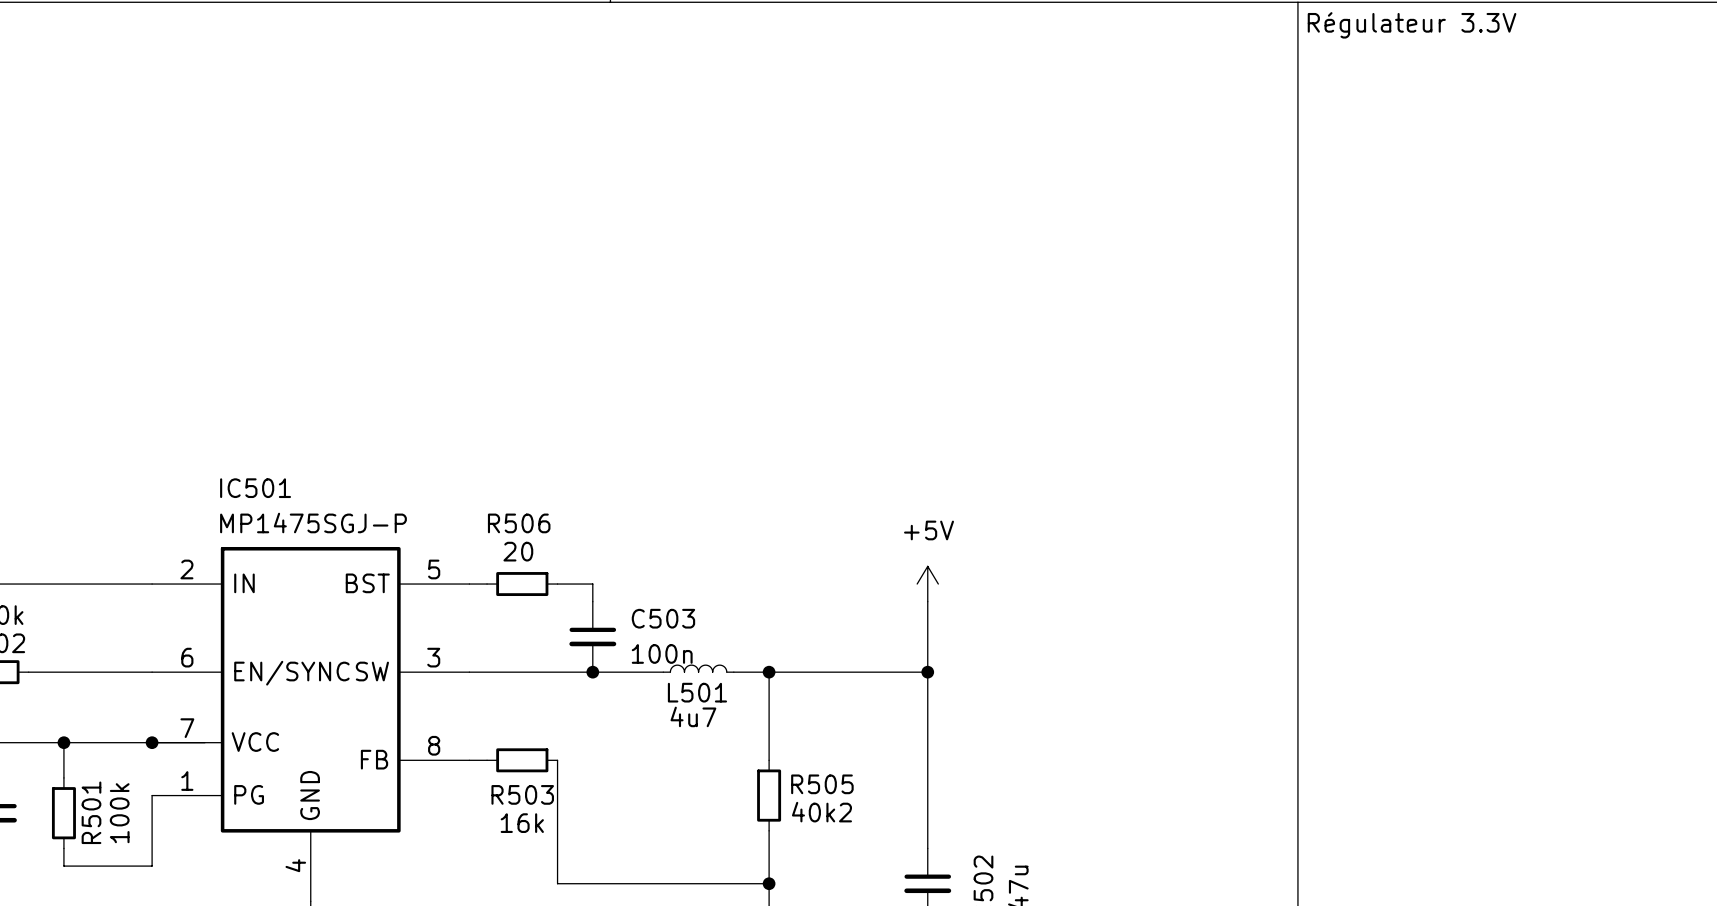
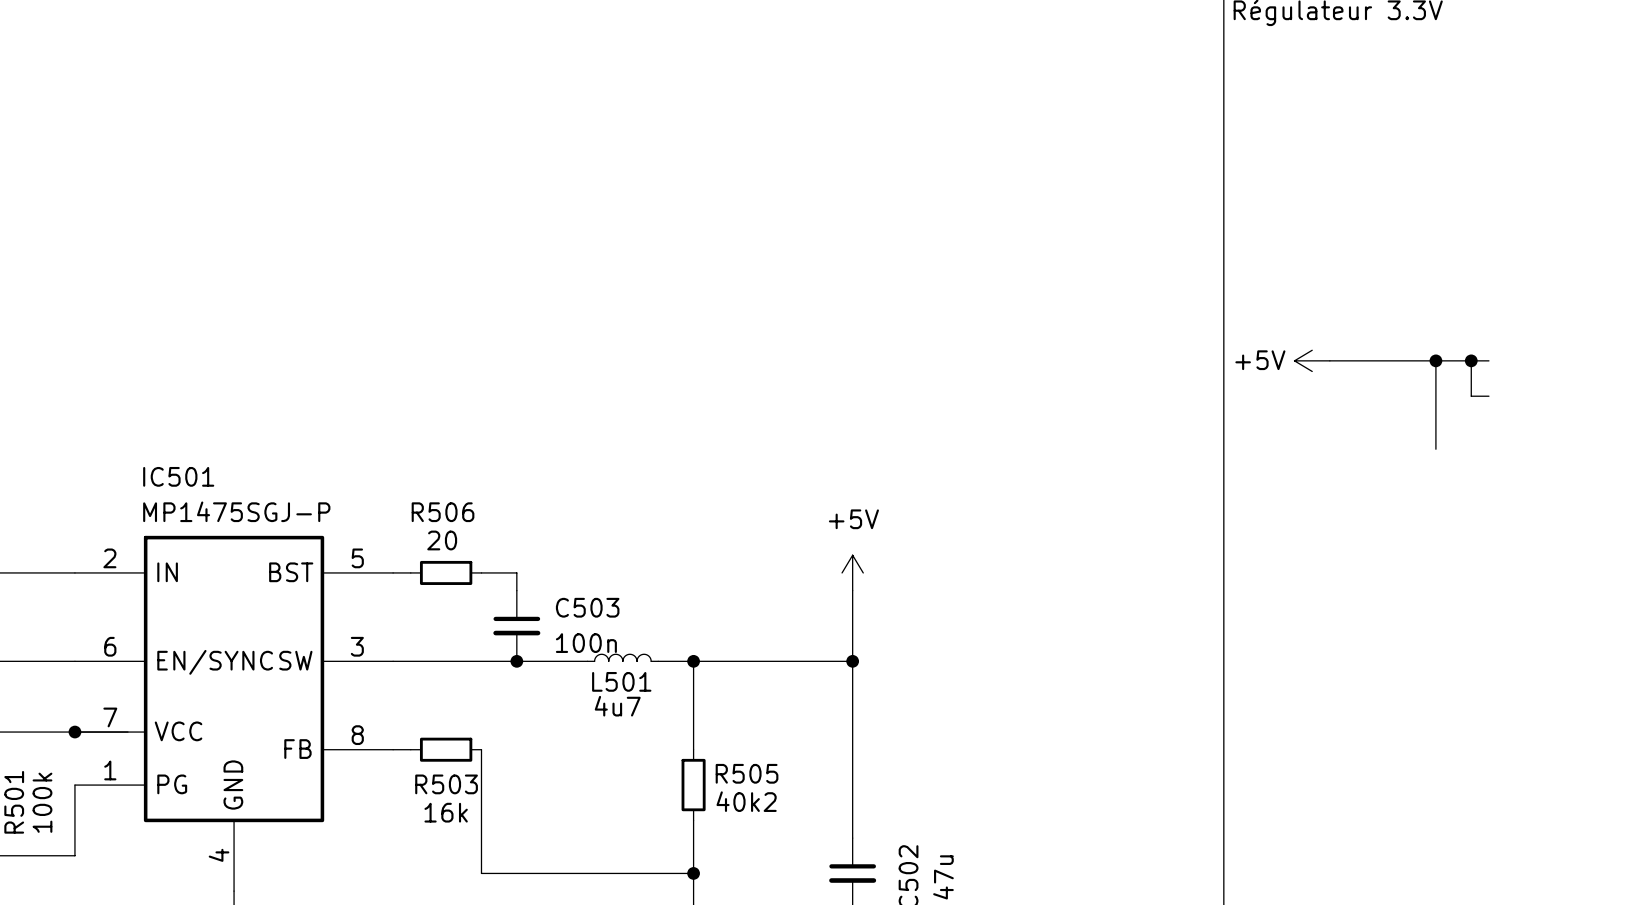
power symbol: none -> +5V (1312, 360)
wire: none -> (1329, 360) (1488, 360)
wire: none -> (1435, 360) (1435, 449)
junction: none -> (1435, 360)
wire: none -> (1471, 360) (1471, 396) (1488, 396)
junction: none -> (1471, 360)

